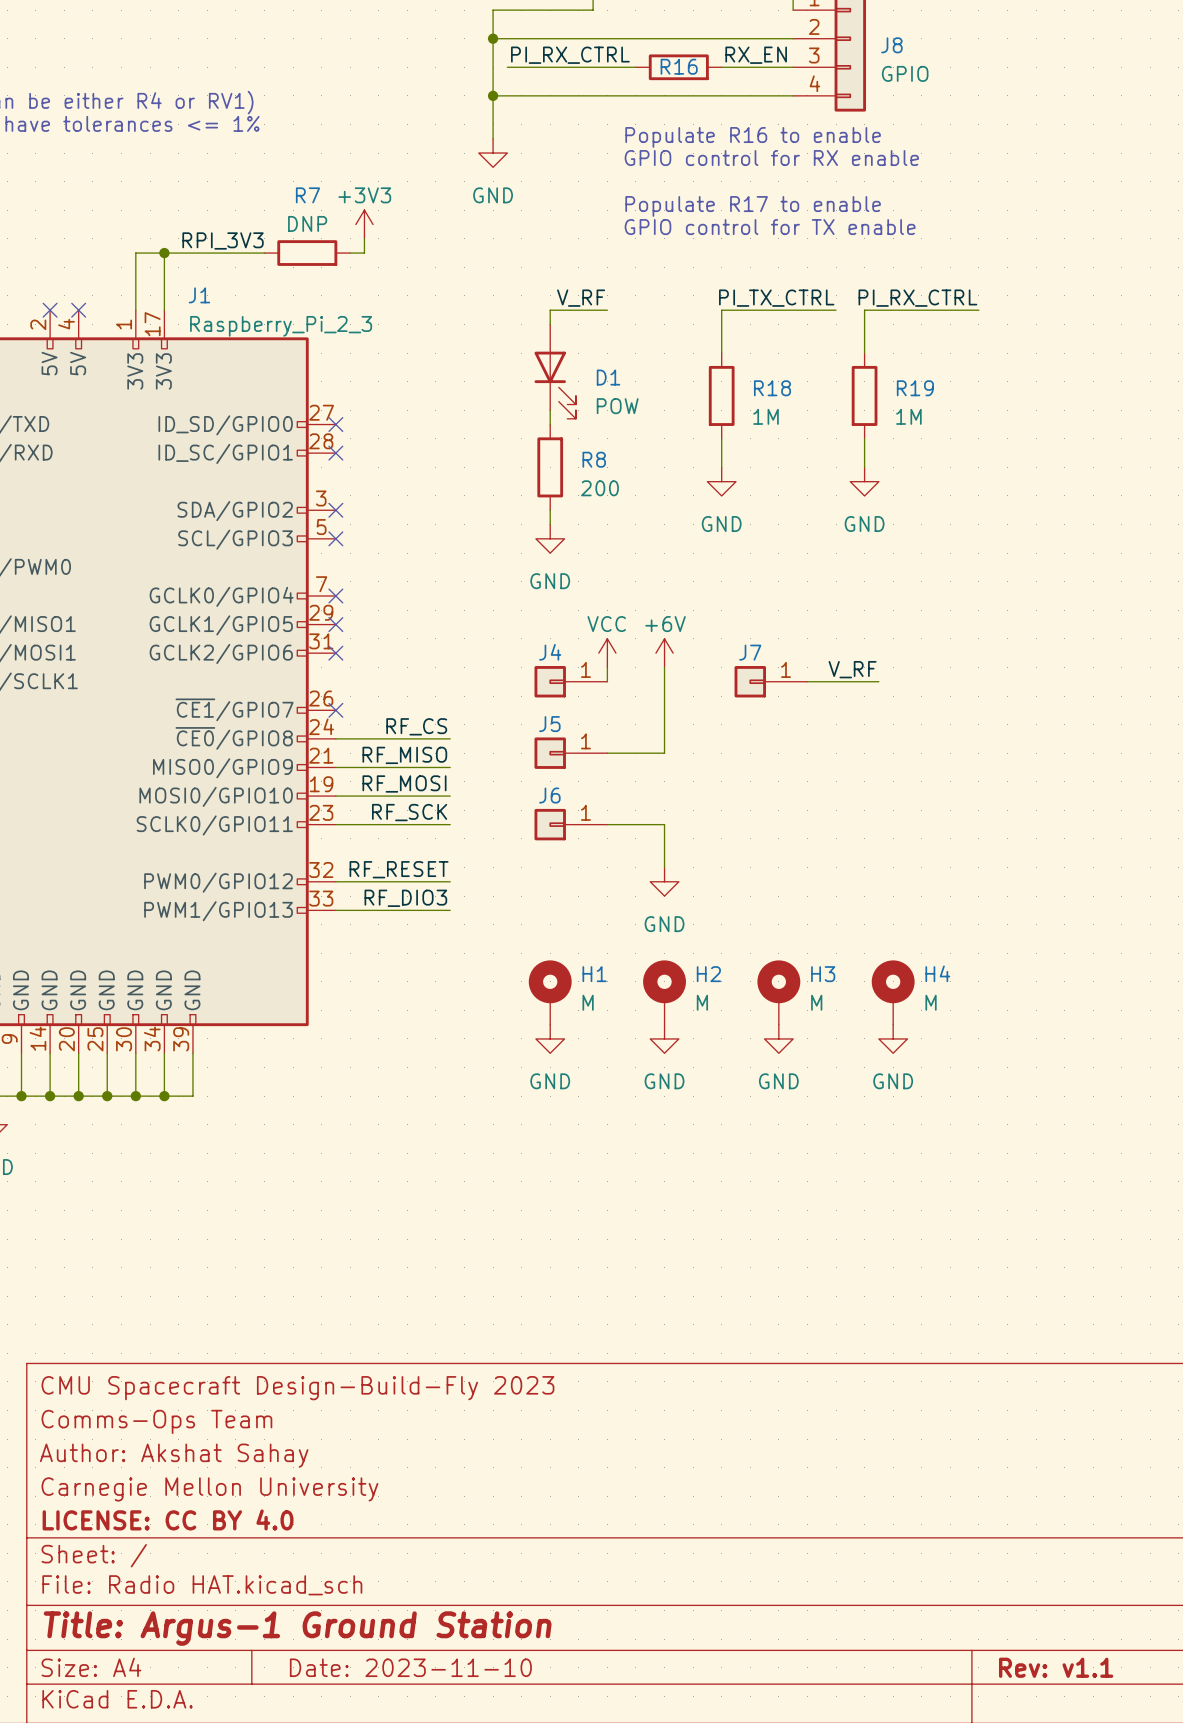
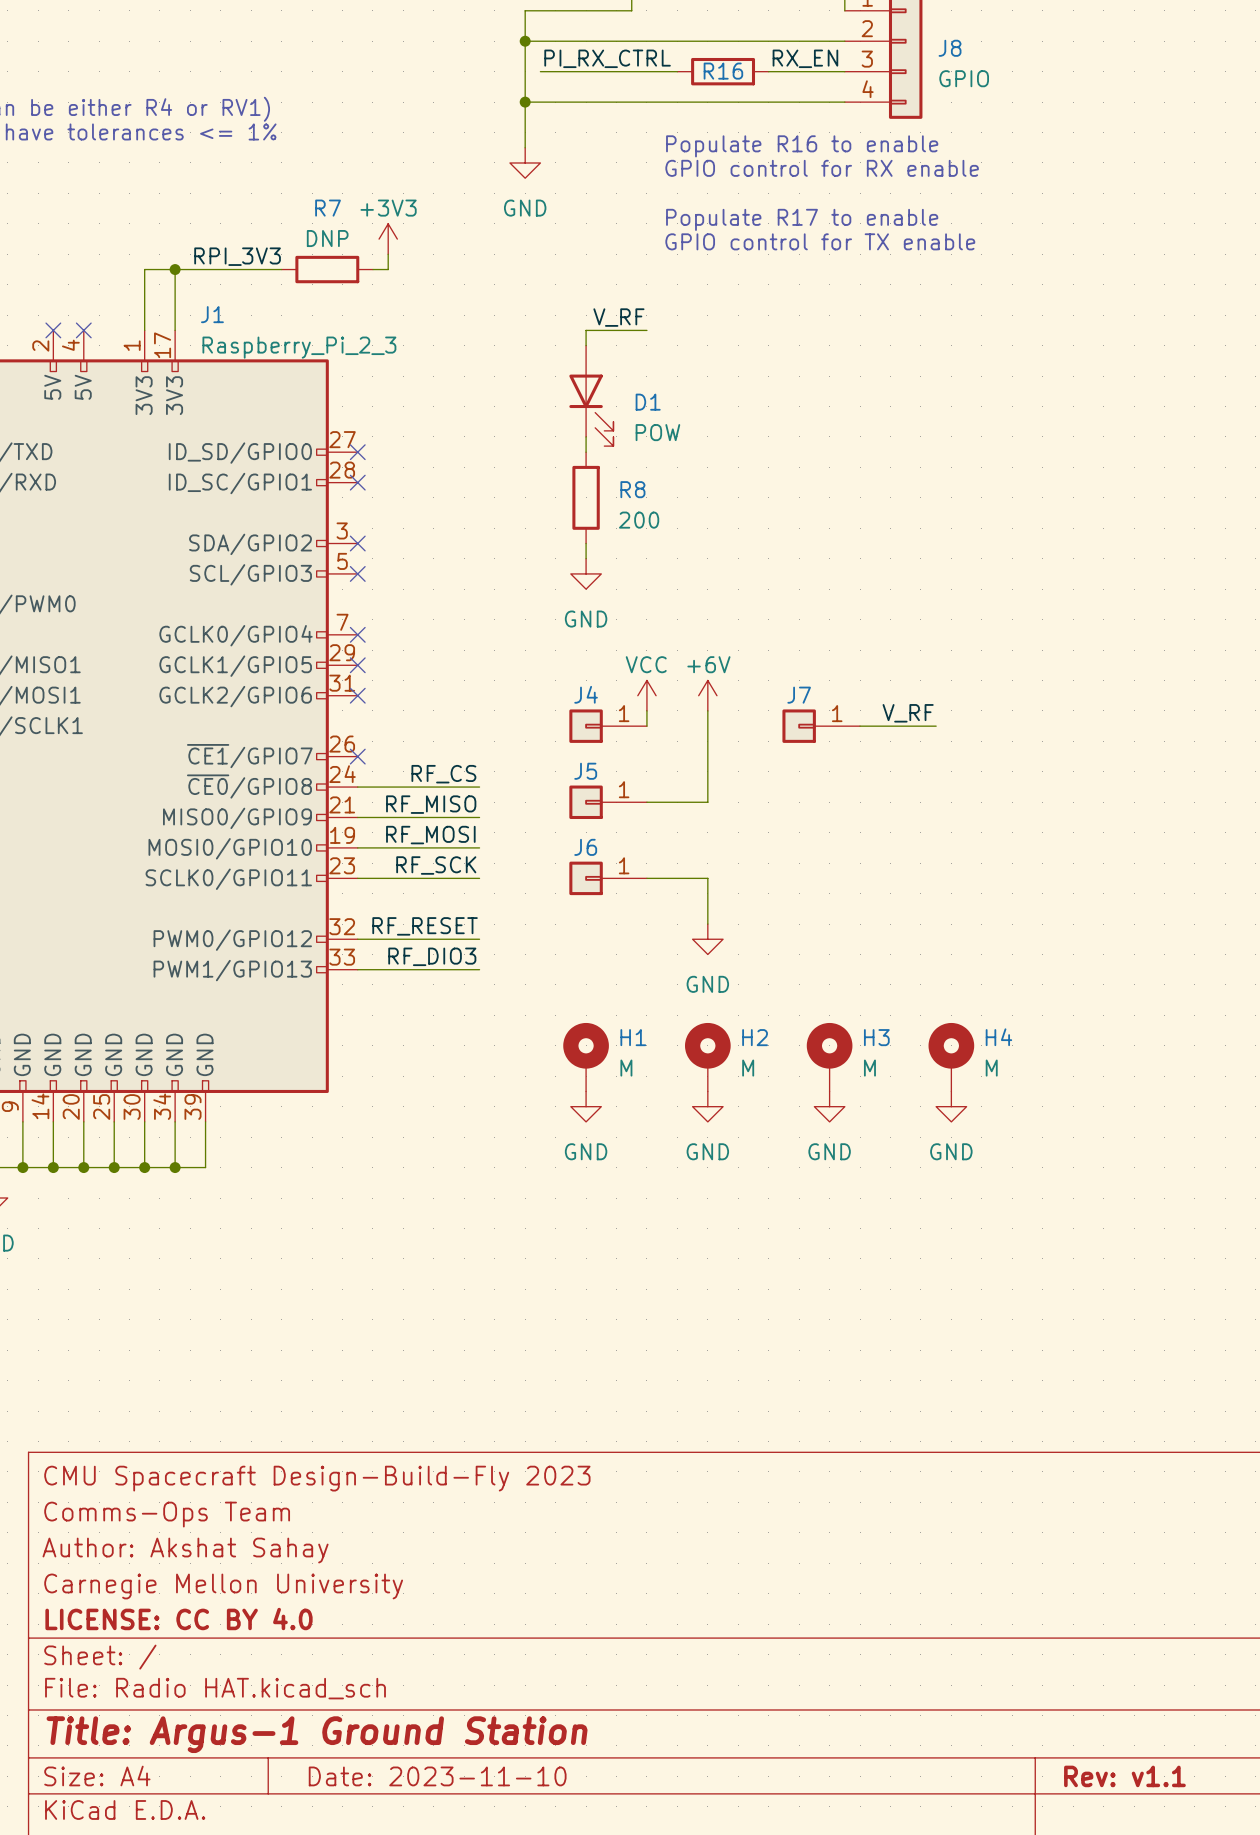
label: PI_TX_CTRL (776, 298) -> none
label: PI_RX_CTRL (917, 298) -> none
wire: (836, 310) (721, 310) (721, 353) -> none
wire: (978, 310) (864, 310) (864, 353) -> none
R18: 1M (721, 395) -> none
R19: 1M (864, 395) -> none
wire: (721, 438) (721, 467) -> none
wire: (864, 438) (864, 467) -> none
power symbol: GND (721, 481) -> none
power symbol: GND (864, 481) -> none

